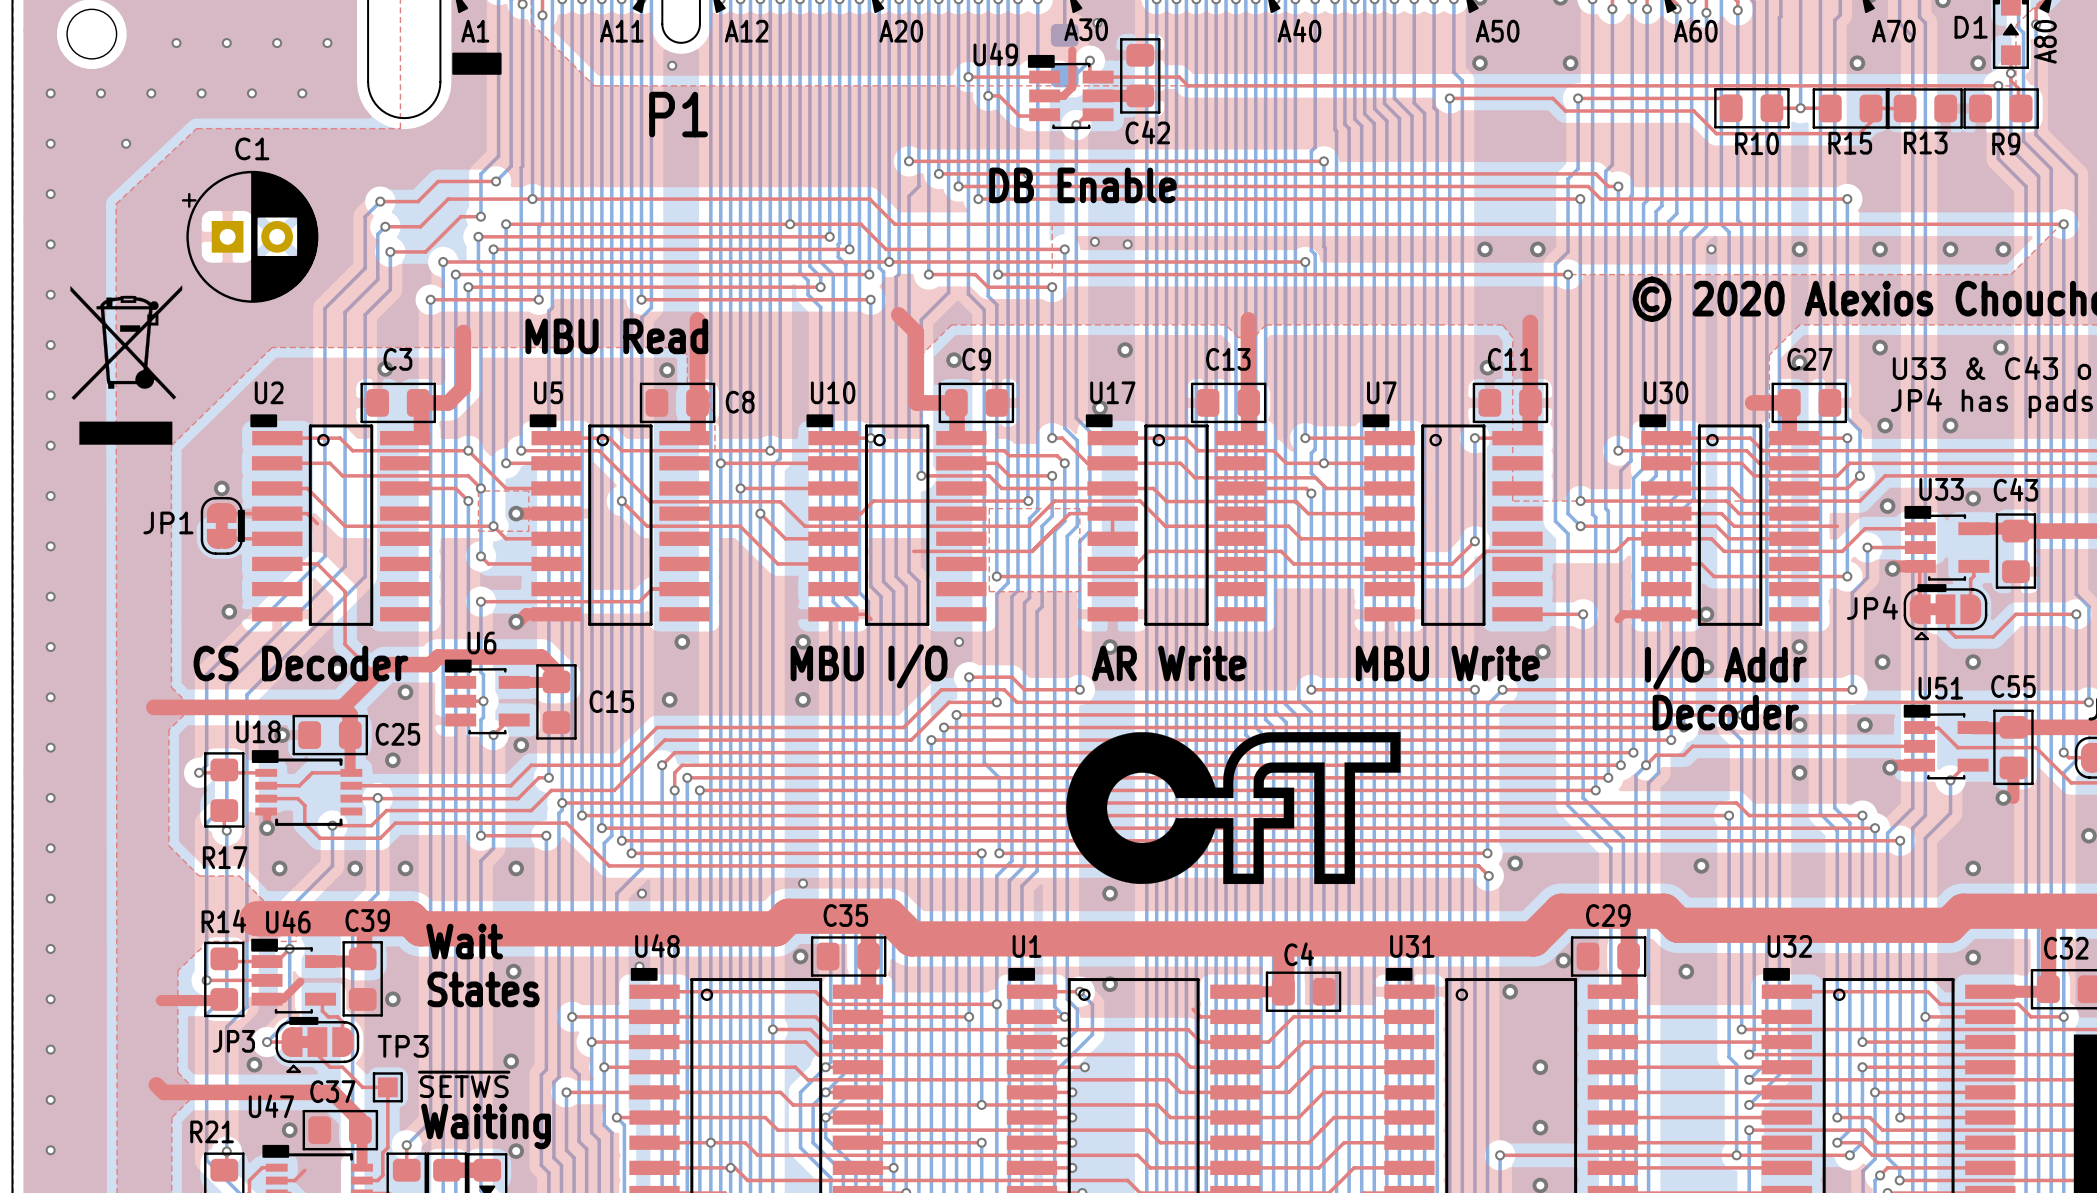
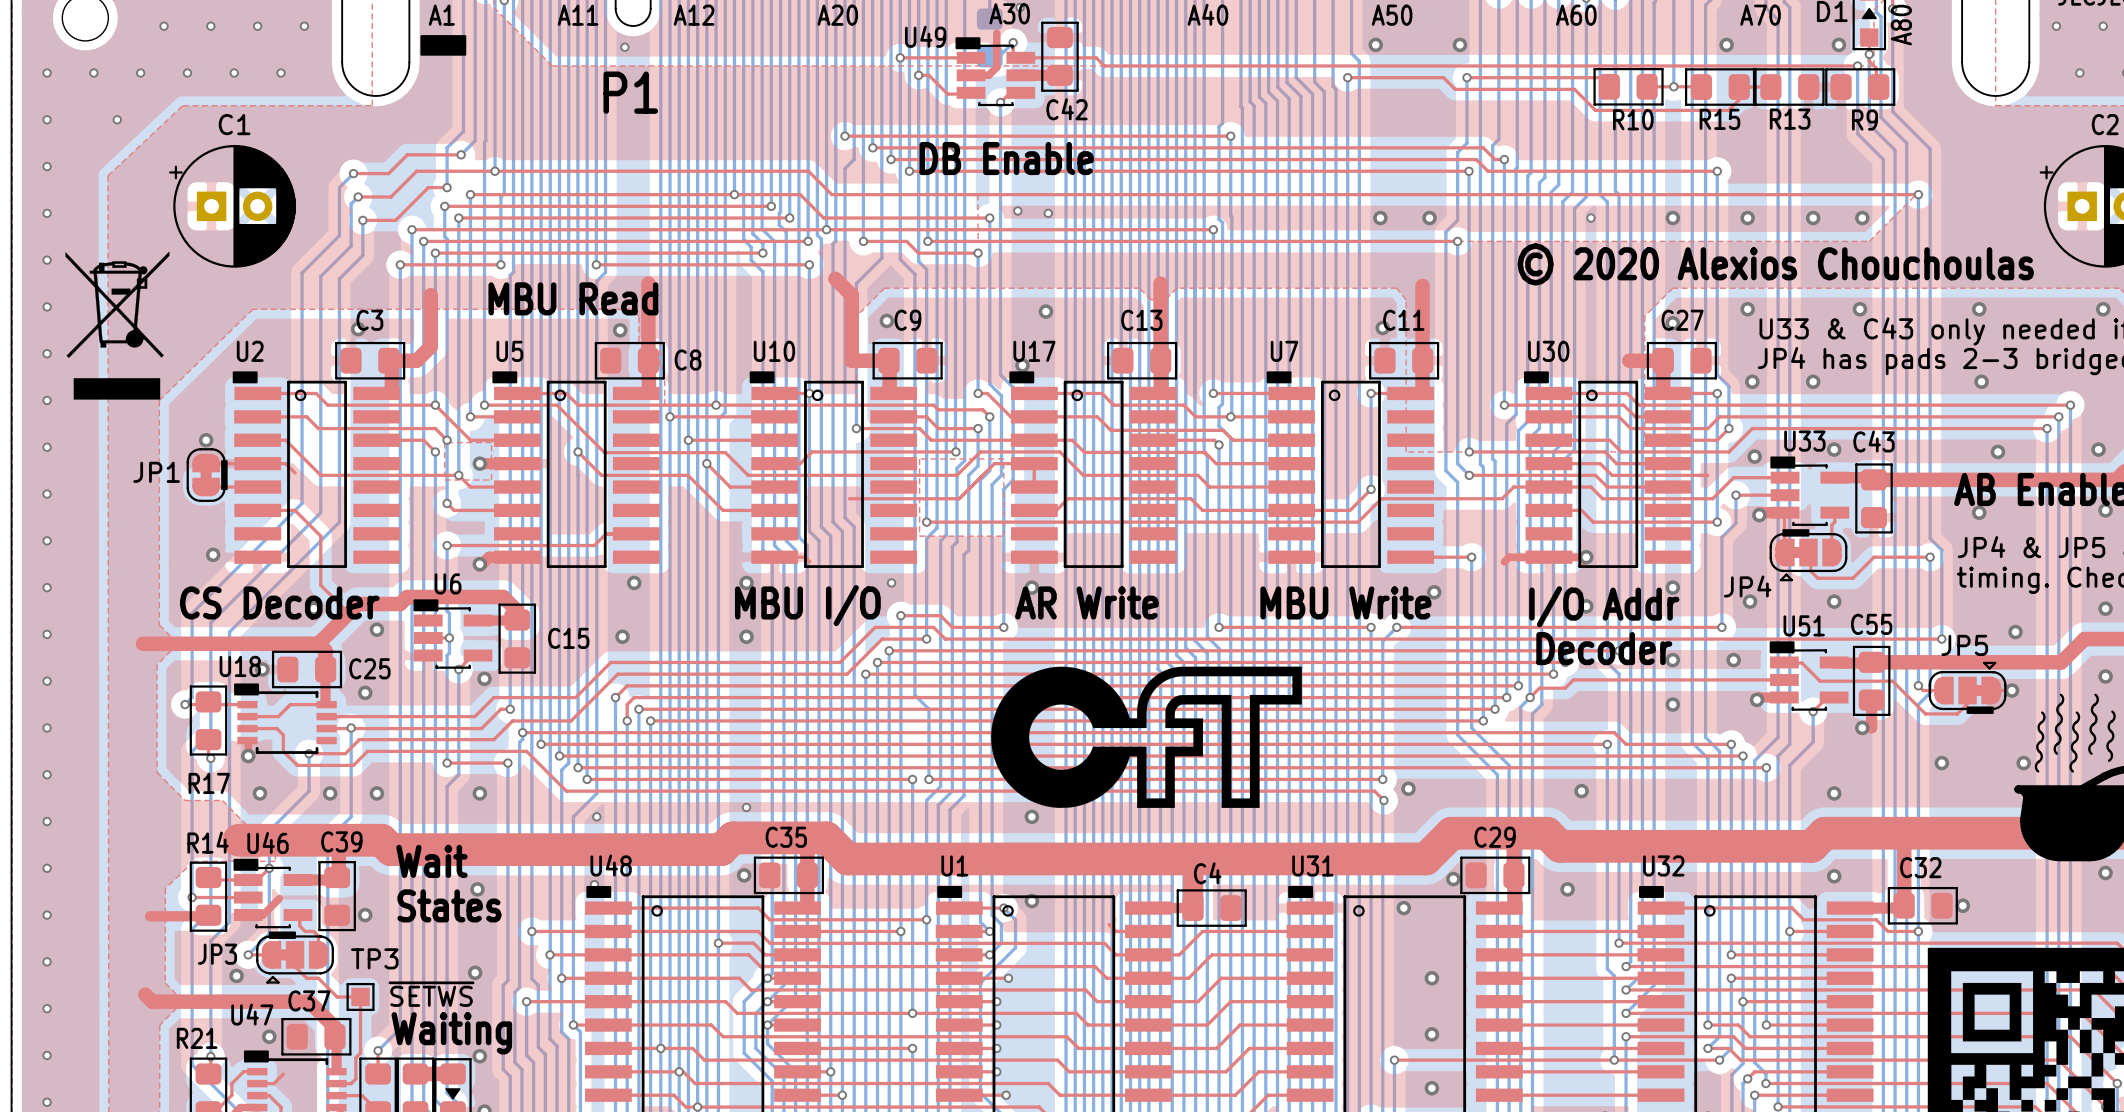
JP4 name position: JP4 (1872, 608) -> JP4 (1747, 586)

